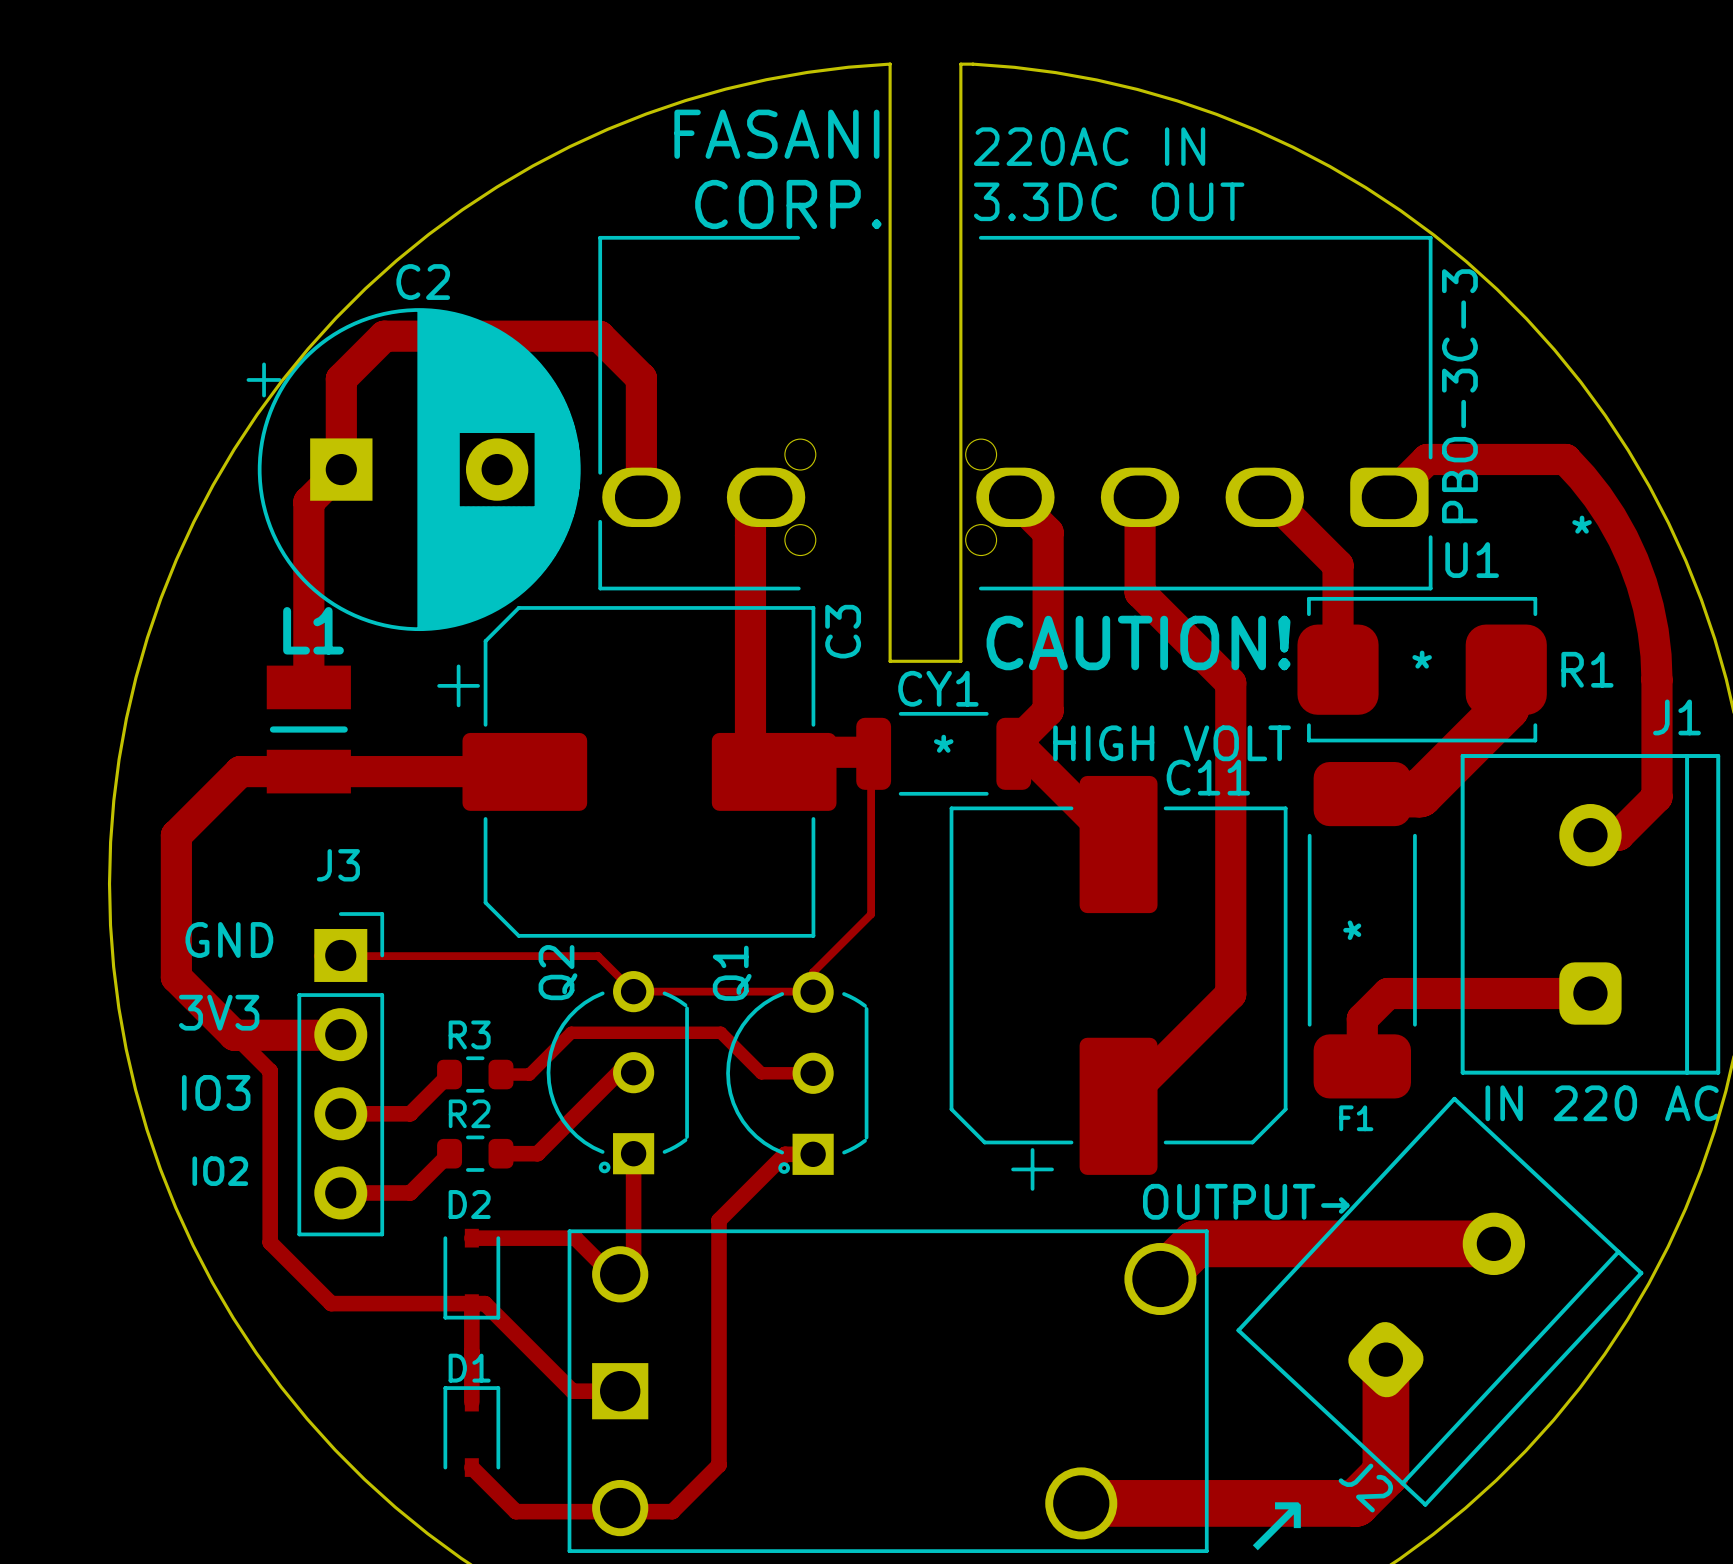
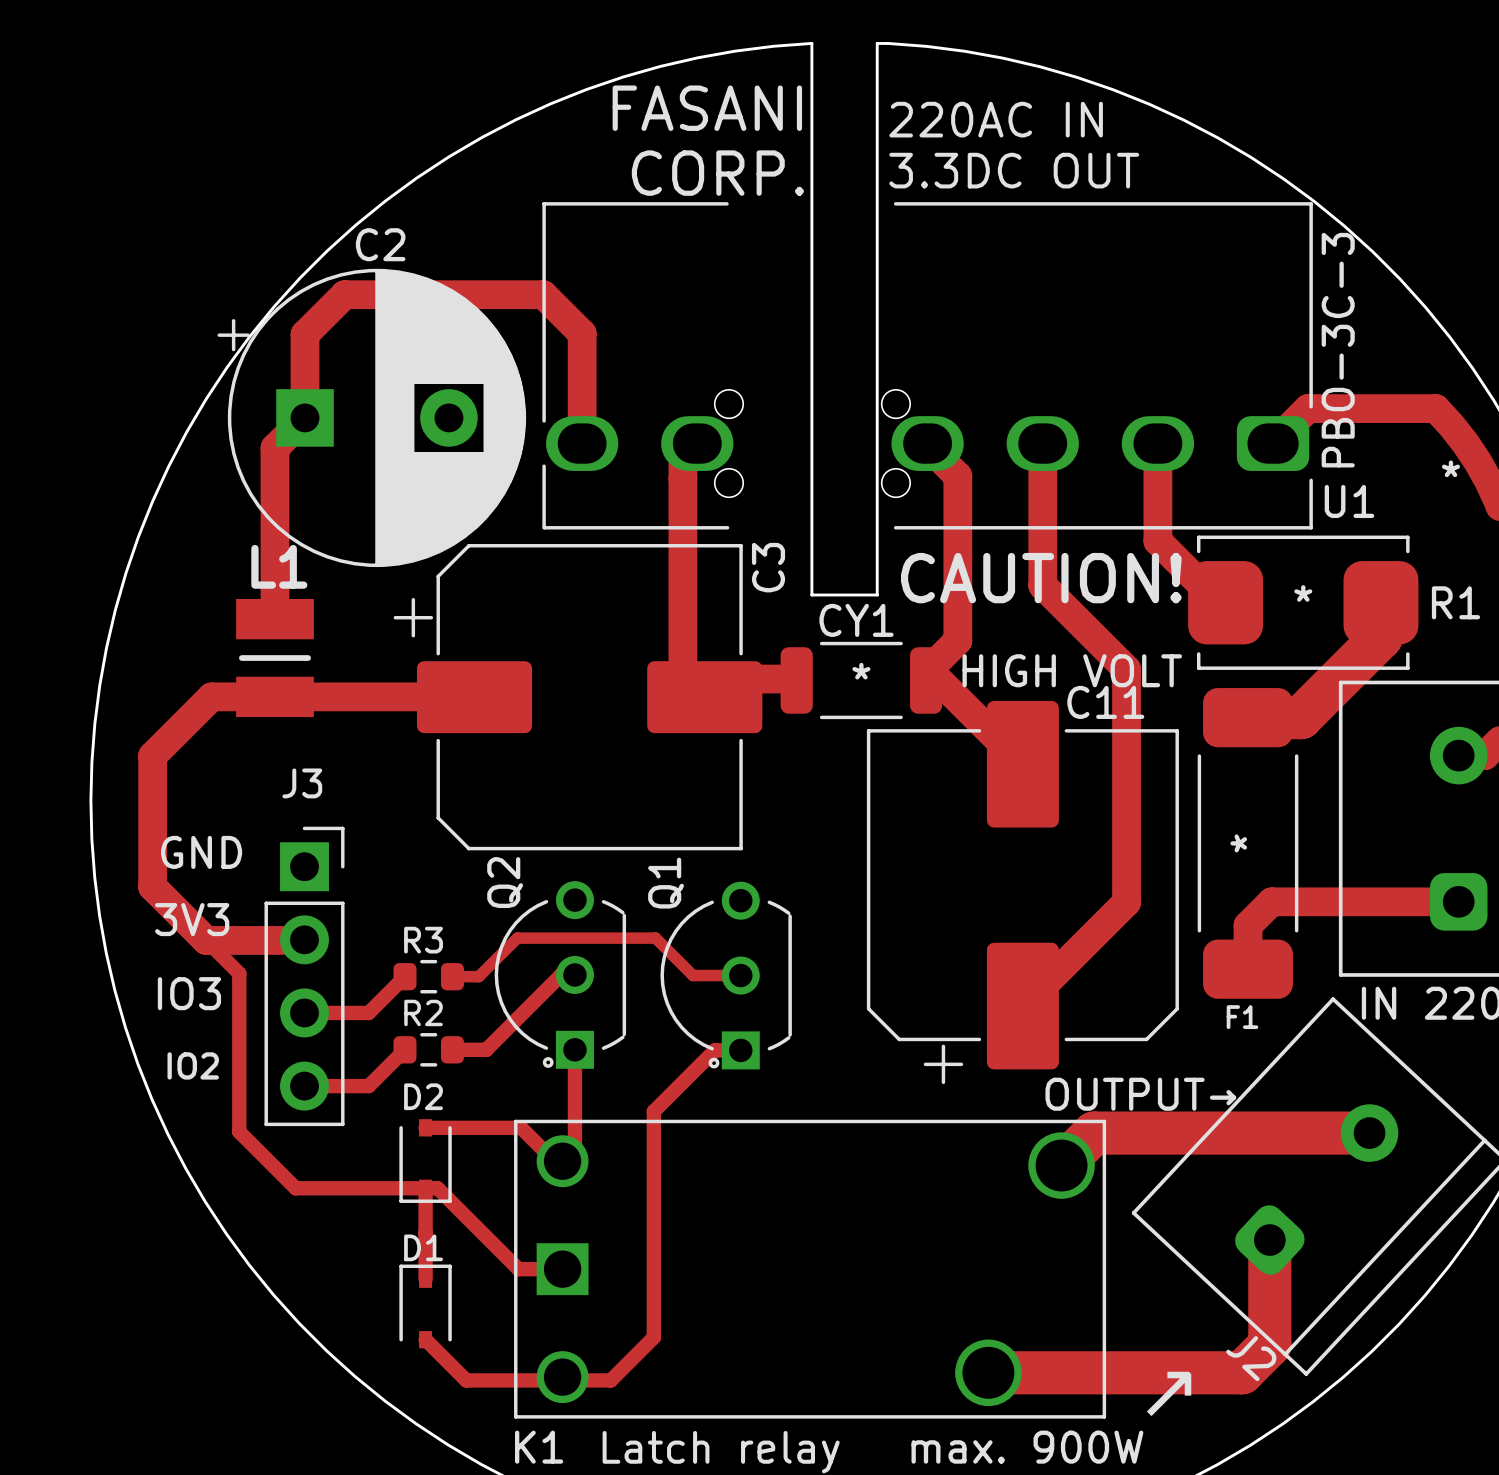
track: (1264, 497) (1270, 497) (1338, 565) (1338, 669) -> (1157, 443) (1157, 541) (1219, 602) (1225, 602)
track: (1140, 592) (1230, 683) (1230, 741) -> (1042, 531) (1042, 585) (1126, 669)
track: (873, 753) (871, 756) (871, 914) (813, 972) (813, 992) (633, 991) (598, 956) (317, 956) -> none

